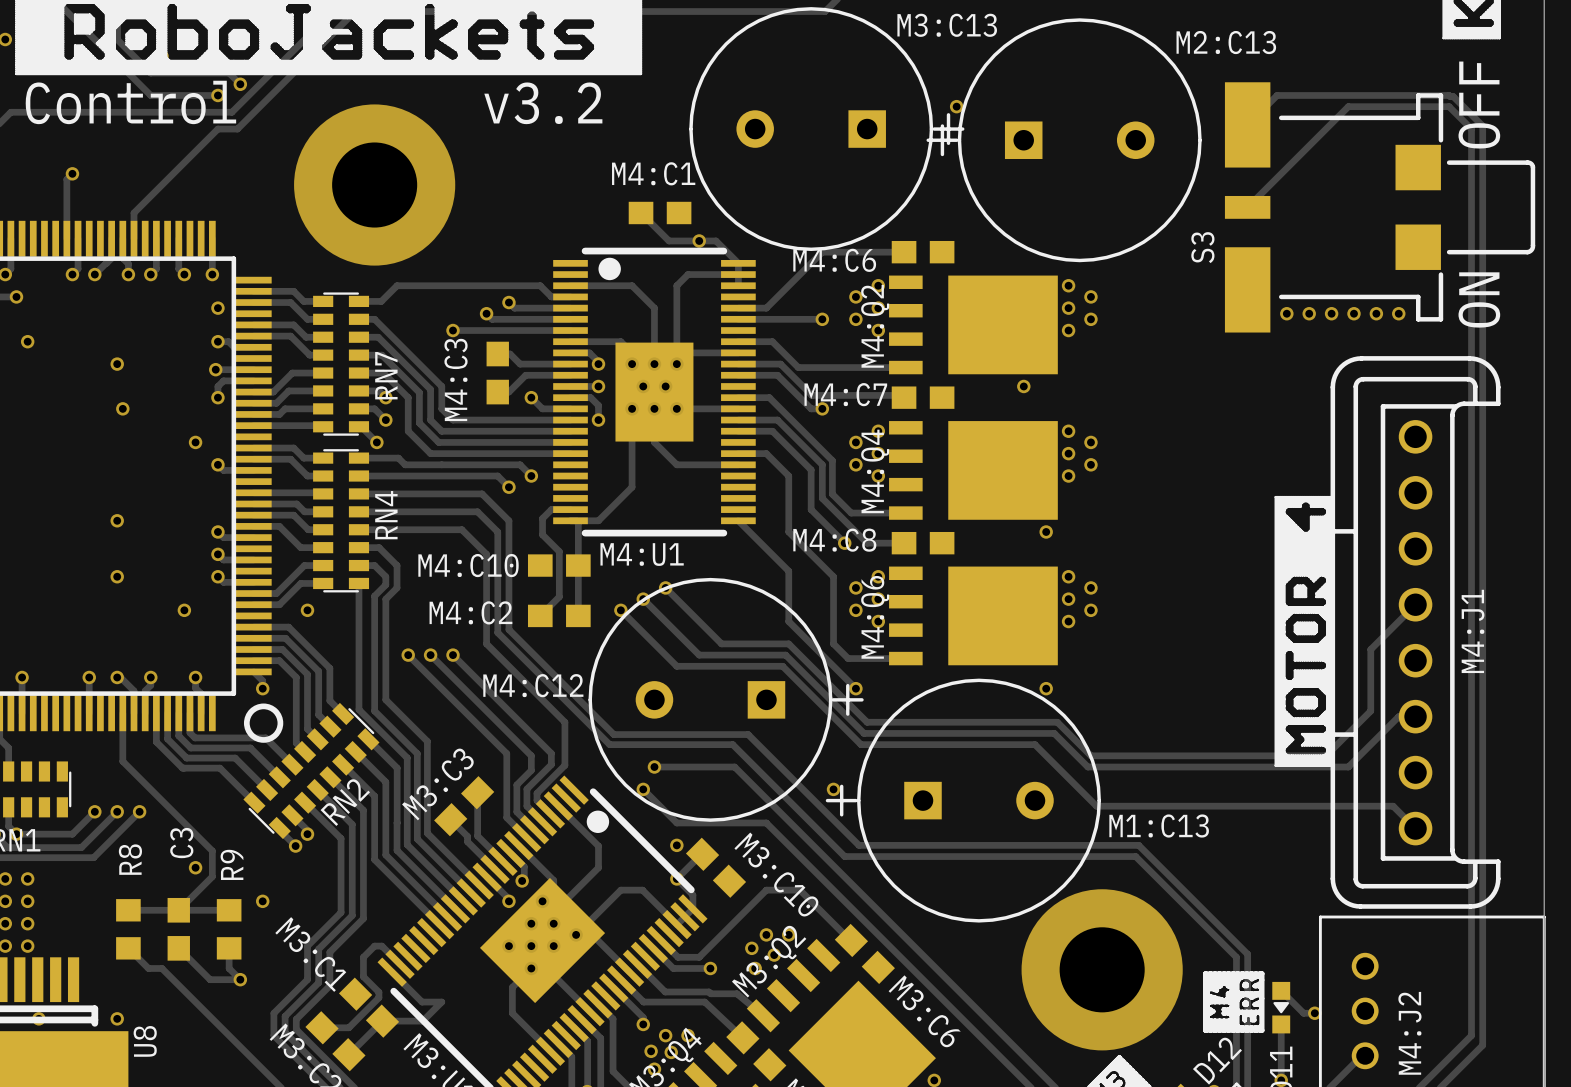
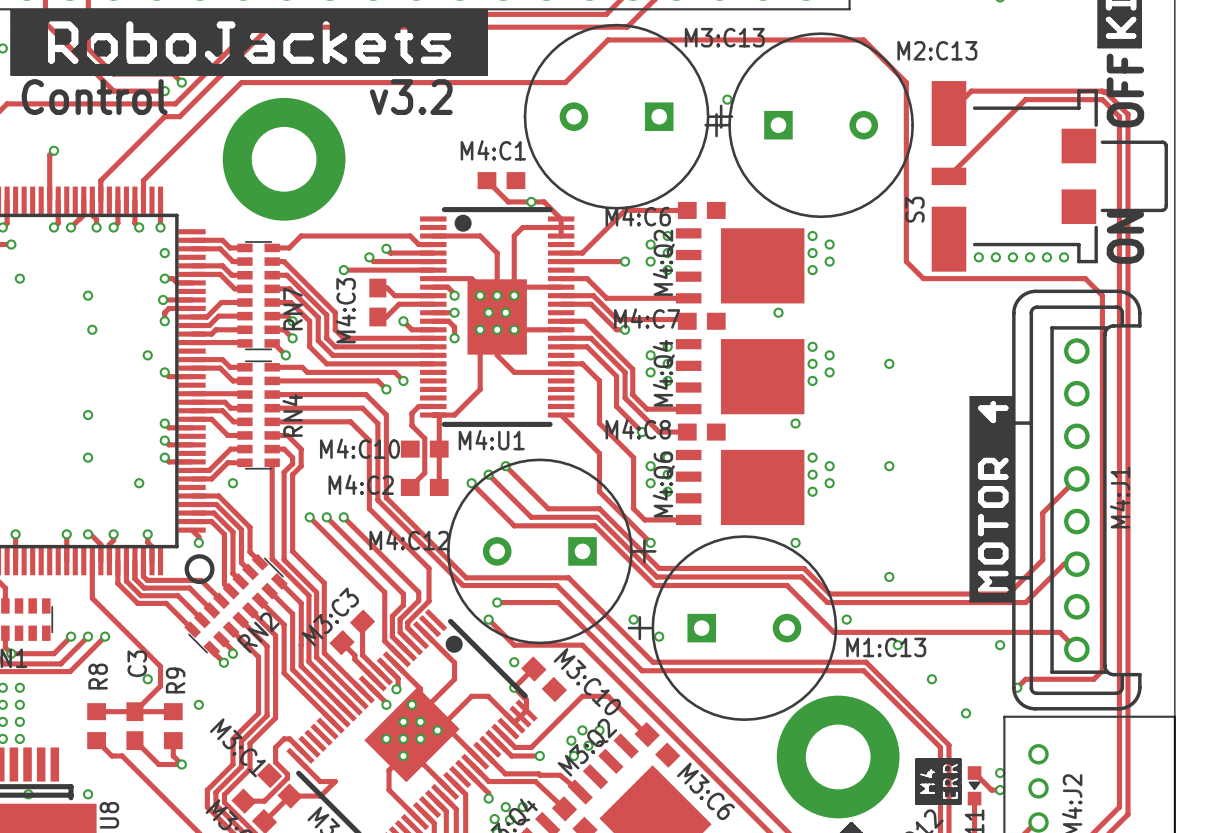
track: none -> (143, 200) (143, 180) (241, 82) (565, 82) (608, 39) (863, 39) (906, 82) (906, 261) (923, 278) (1085, 278) (1102, 295) (1102, 670) (1093, 679) (1025, 679) (1017, 687)
via: none -> (889, 363)
via: none -> (889, 466)
via: none -> (889, 576)
via: none -> (846, 619)
via: none -> (659, 636)
via: none -> (897, 645)
via: none -> (1000, 645)
via: none -> (931, 679)
via: none -> (1017, 687)
via: none -> (966, 713)
via: none -> (1000, 773)

